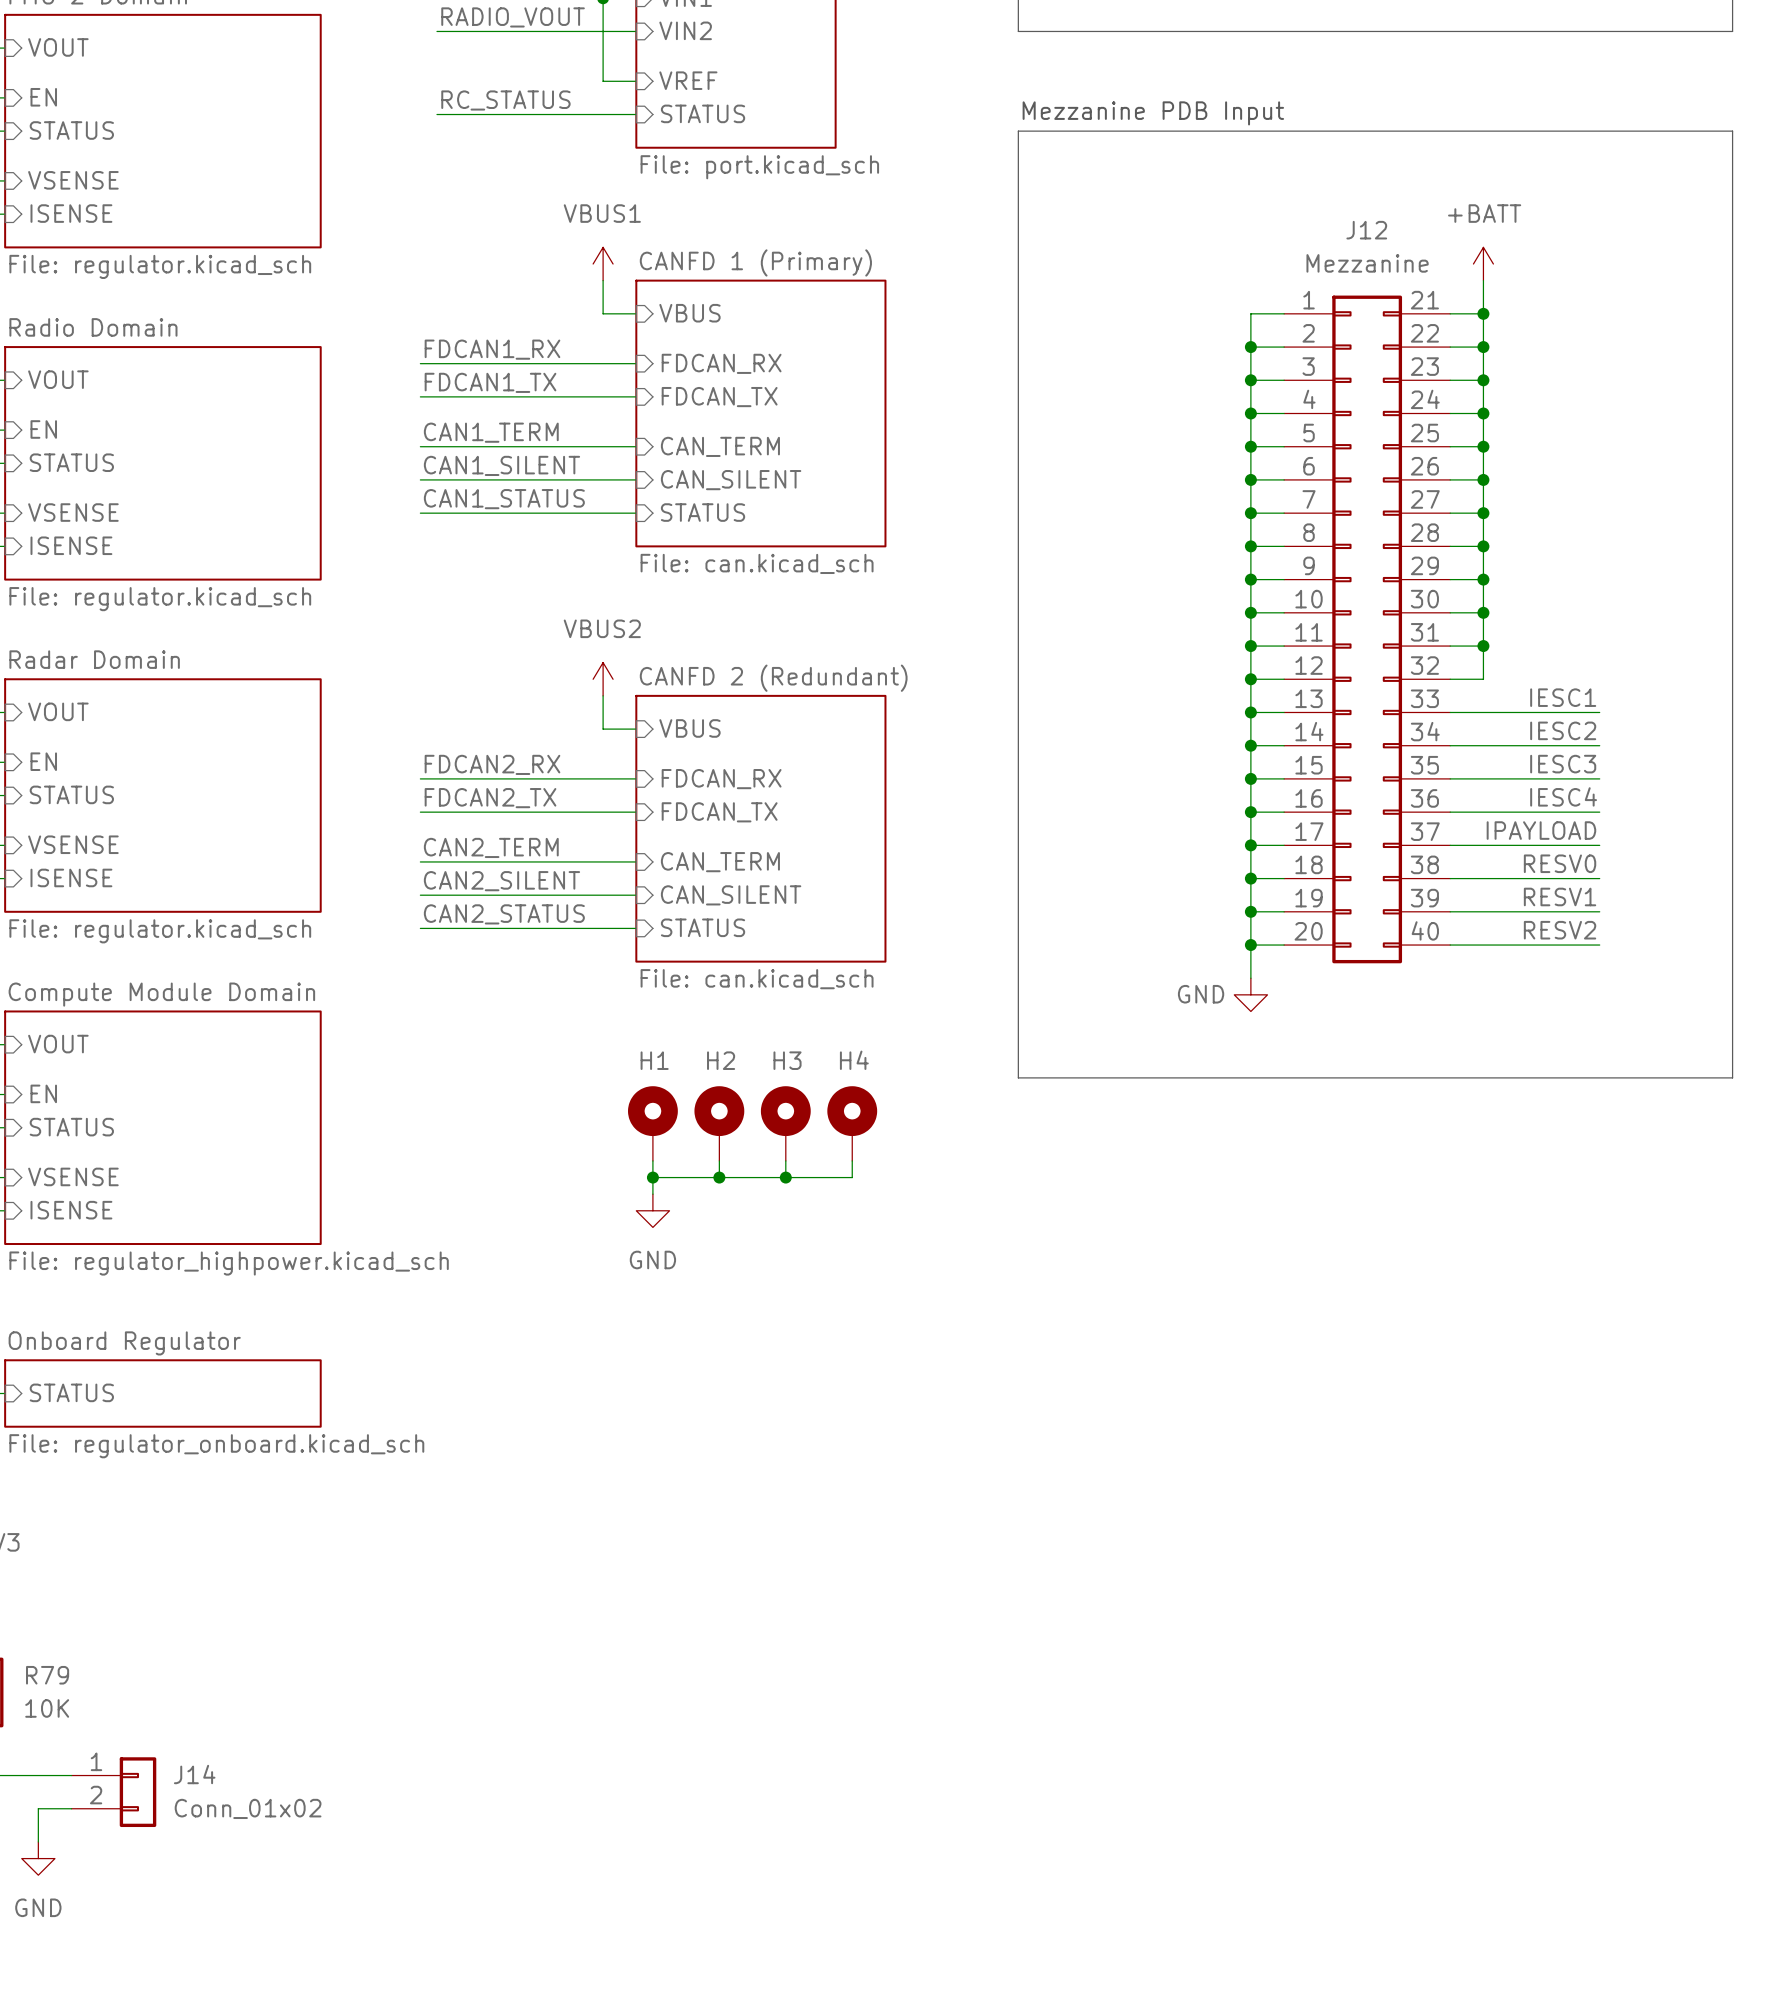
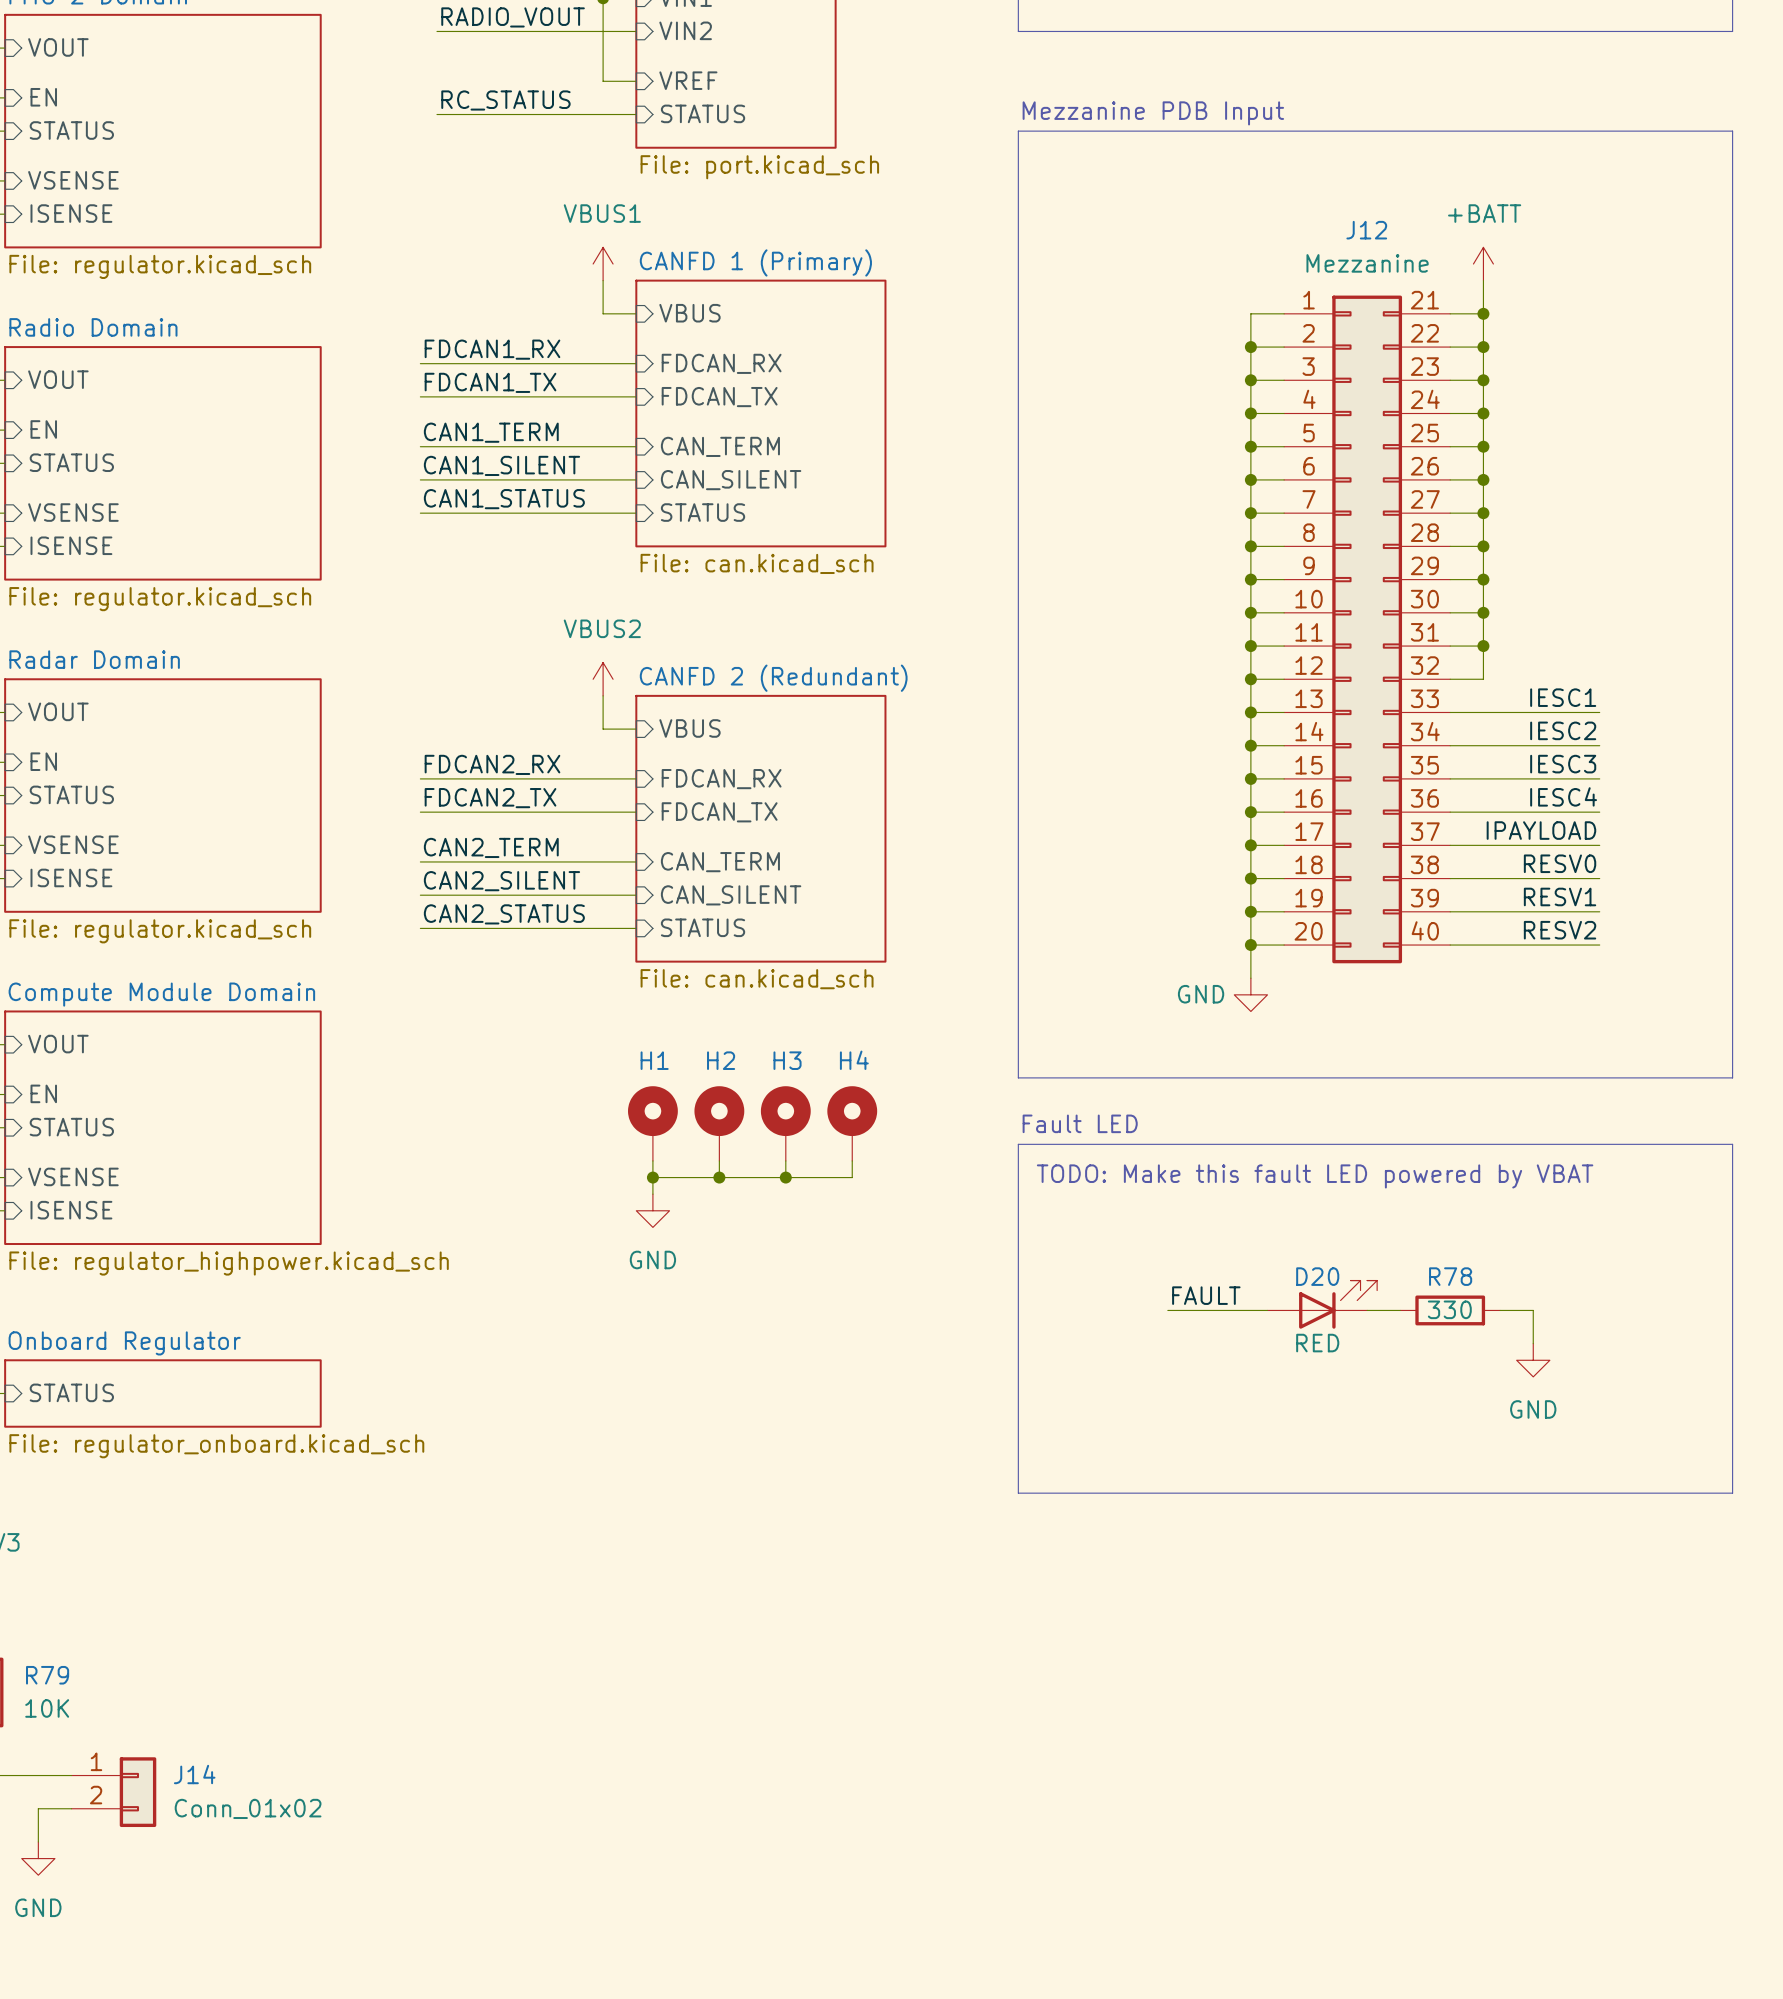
text: none -> Fault LED (1080, 1123)
line: none -> (1018, 1144) (1732, 1144) (1732, 1493) (1018, 1493) (1018, 1144)
text: none -> TODO: Make this fault LED powered by VBAT (1315, 1176)
label: none -> FAULT (1206, 1295)
D20: none -> RED (1322, 1304)
wire: none -> (1167, 1310) (1267, 1310)
wire: none -> (1367, 1310) (1400, 1310)
R78: none -> 330 (1450, 1310)
wire: none -> (1500, 1310) (1533, 1310) (1533, 1343)
power symbol: none -> GND (1533, 1360)

